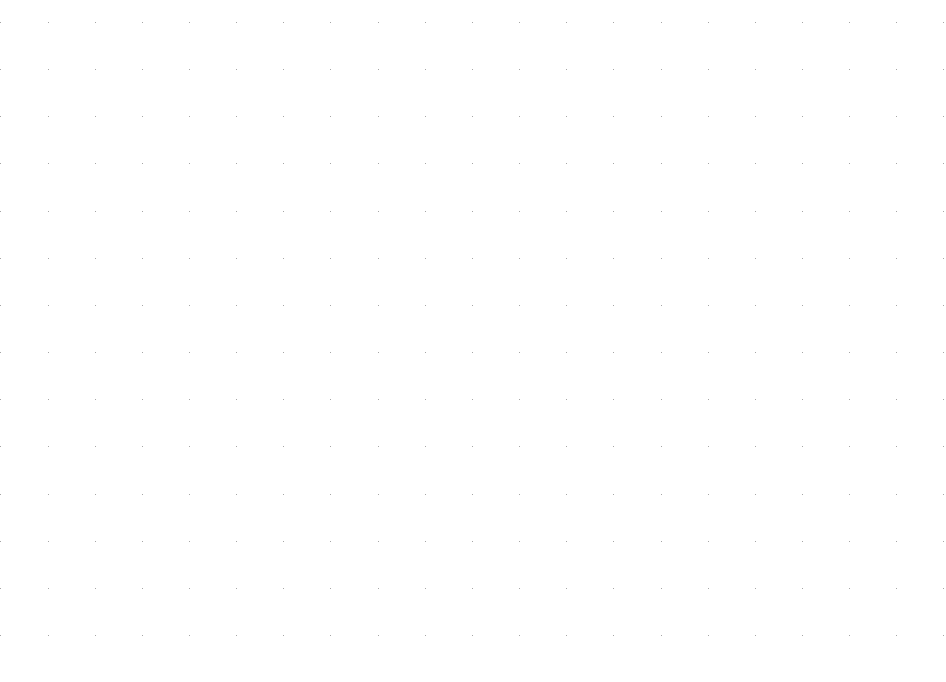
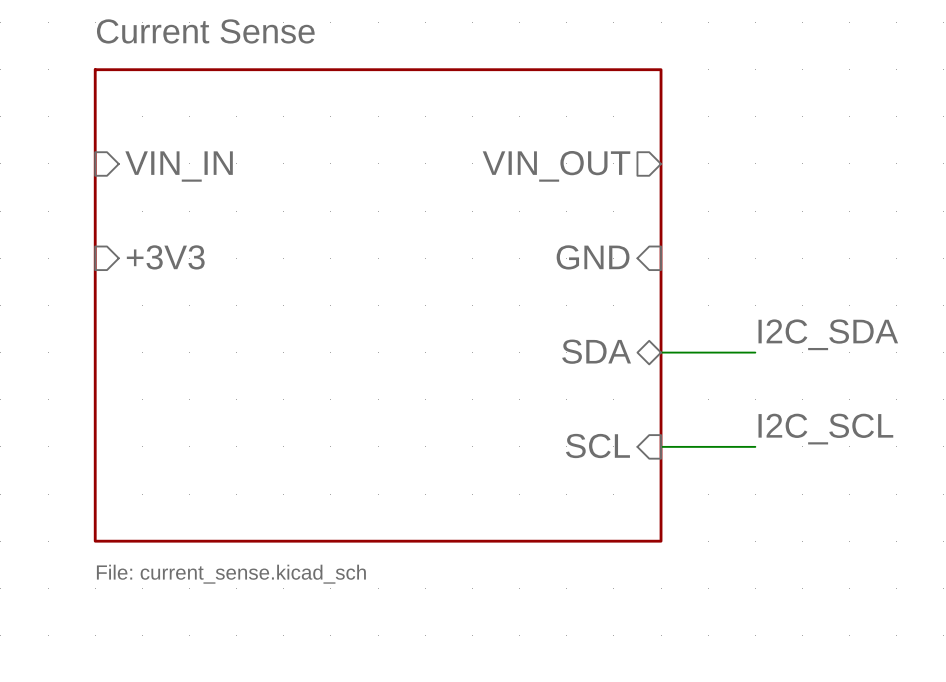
sheet pin: none -> VIN_IN (179, 166)
sheet pin: none -> VIN_OUT (556, 166)
sheet pin: none -> +3V3 (165, 257)
sheet pin: none -> GND (593, 257)
sheet Current Sense: none -> File: current_sense.kicad_sch (378, 305)
label: none -> I2C_SDA (828, 334)
sheet pin: none -> SDA (596, 351)
wire: none -> (661, 352) (755, 352)
label: none -> I2C_SCL (825, 429)
sheet pin: none -> SCL (597, 446)
wire: none -> (661, 446) (755, 446)

